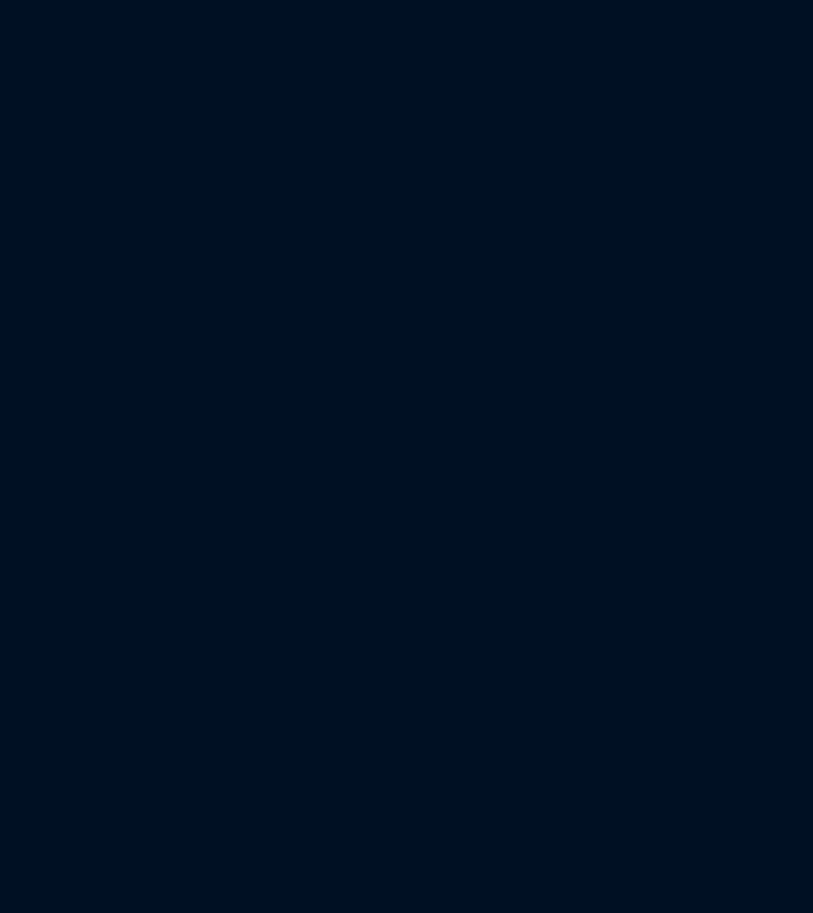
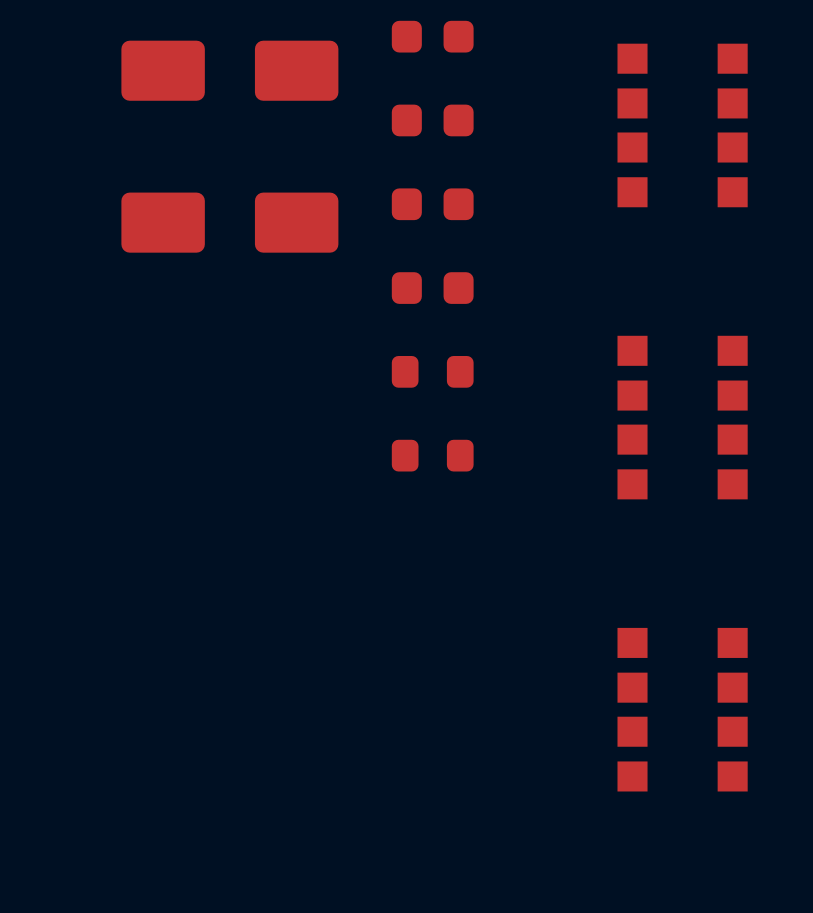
part: none -> (432, 36)
part: none -> (229, 70)
part: none -> (432, 120)
part: none -> (682, 125)
part: none -> (432, 204)
part: none -> (229, 222)
part: none -> (432, 288)
part: none -> (432, 371)
part: none -> (682, 417)
part: none -> (432, 455)
part: none -> (682, 709)

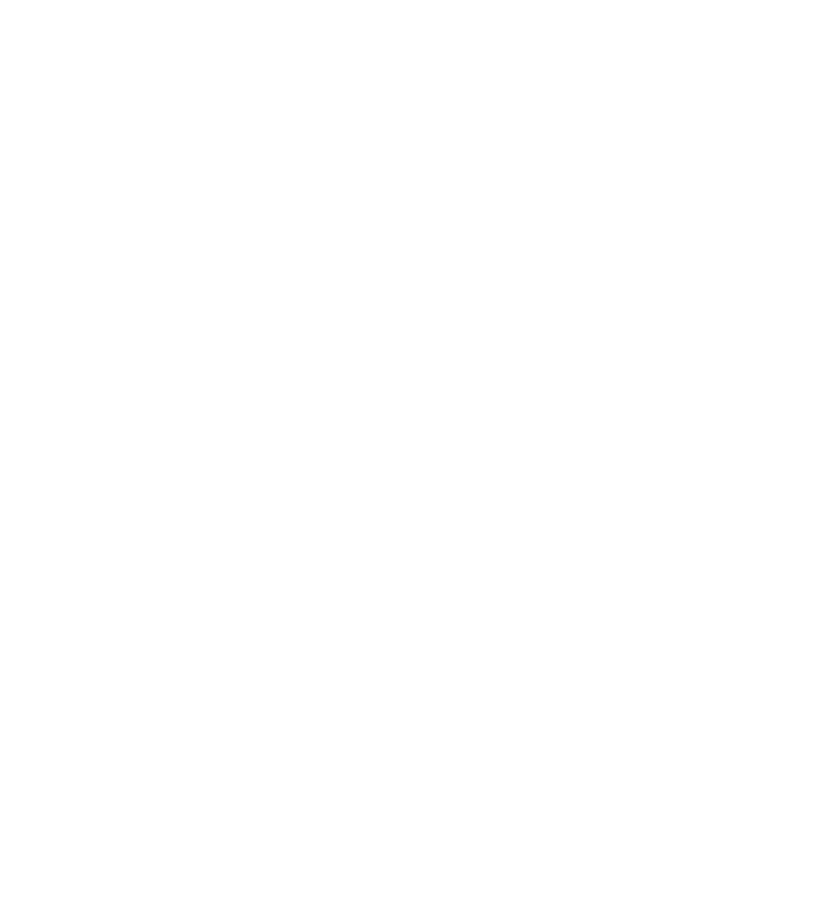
part: (432, 36) -> none
part: (229, 70) -> none
part: (432, 120) -> none
part: (682, 125) -> none
part: (432, 204) -> none
part: (229, 222) -> none
part: (432, 288) -> none
part: (432, 371) -> none
part: (682, 417) -> none
part: (432, 455) -> none
part: (682, 709) -> none

